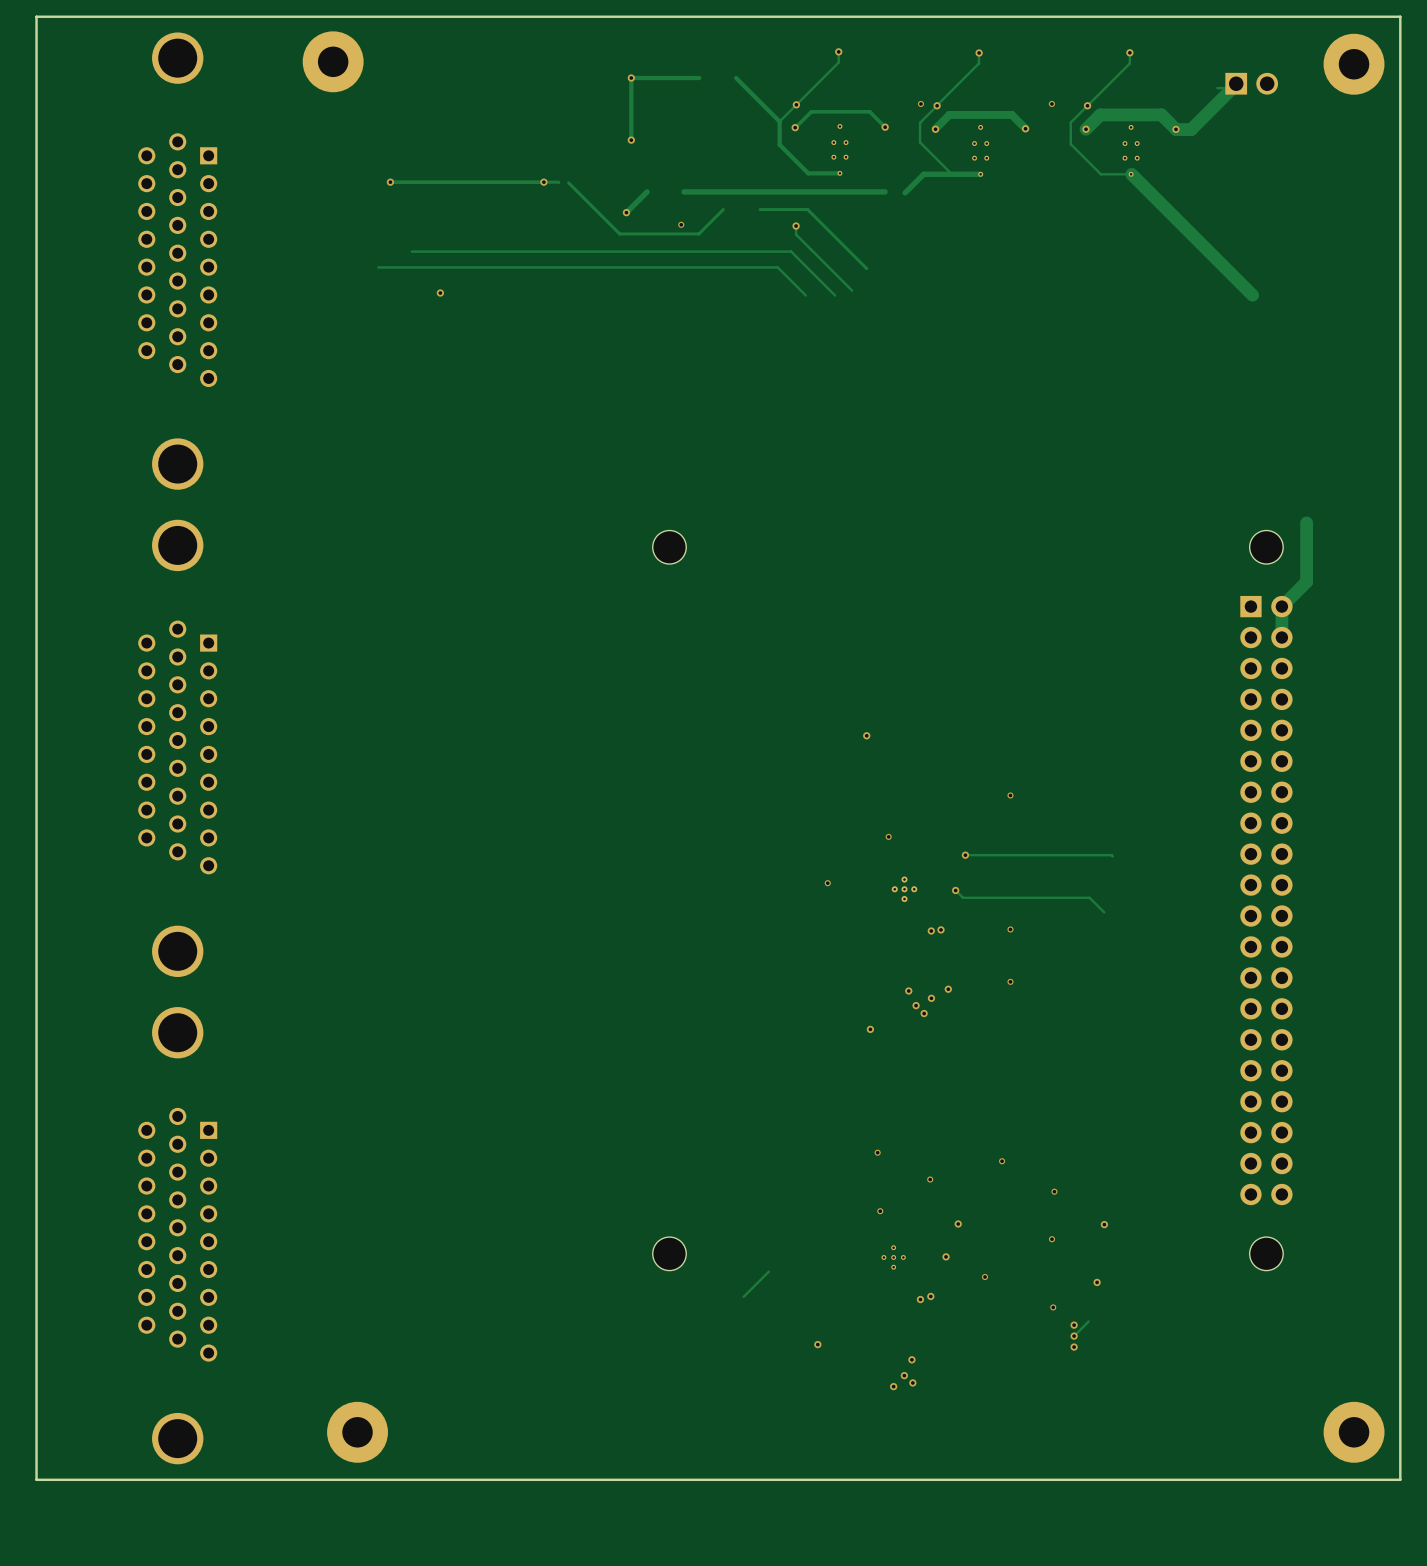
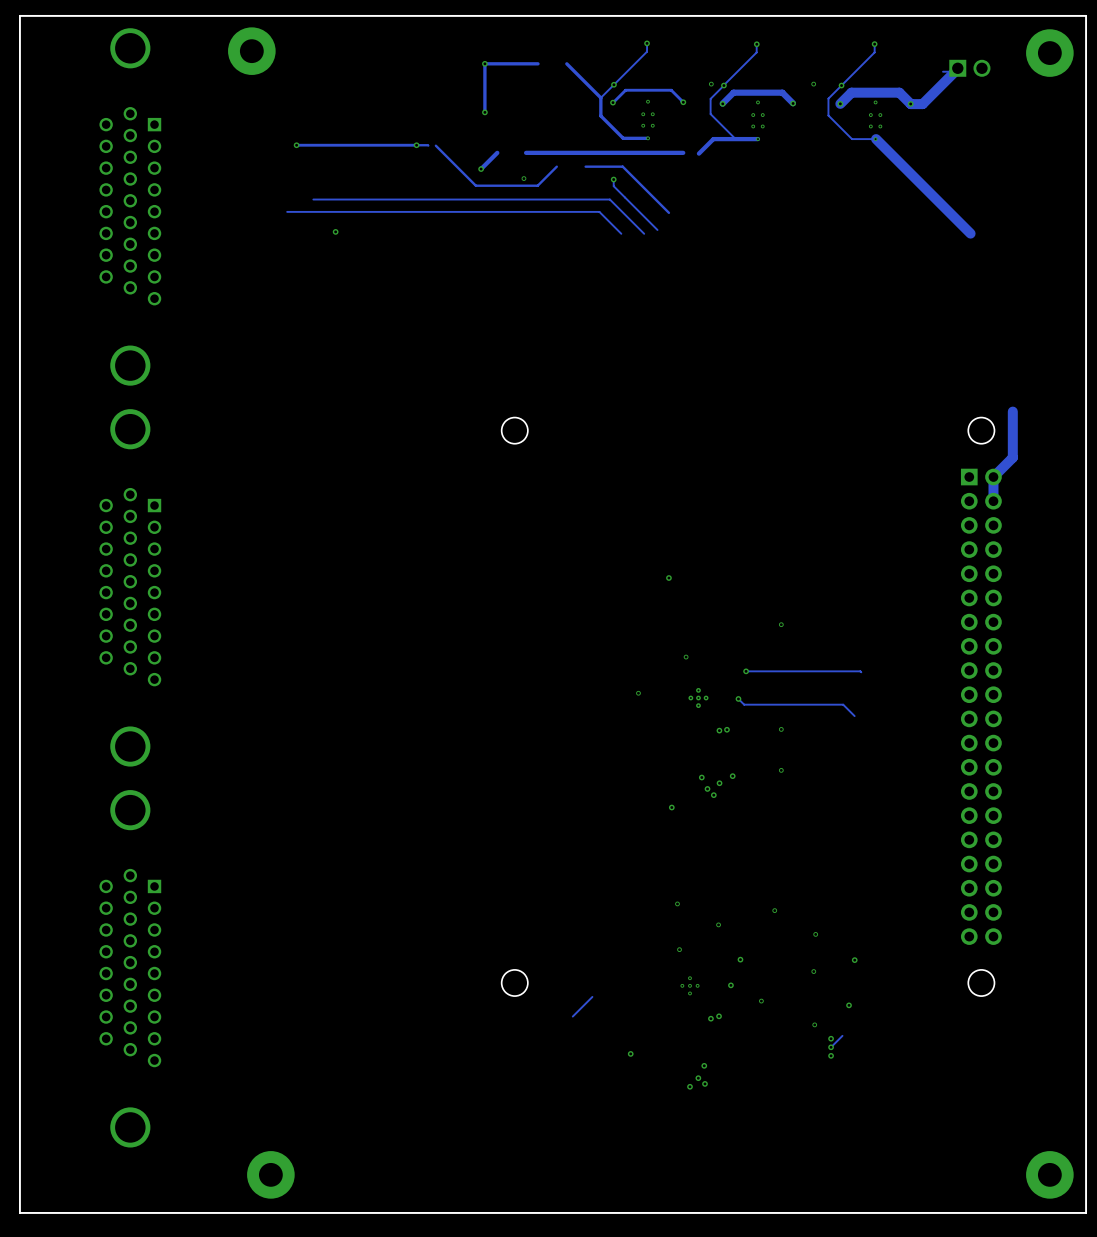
part position: (357, 1432) -> (270, 1174)
part position: (1354, 1432) -> (1049, 1174)
board edge: (1400, 1479) (36, 1479) -> (1086, 1159) (1086, 1212) (19, 1212) (19, 1159)

